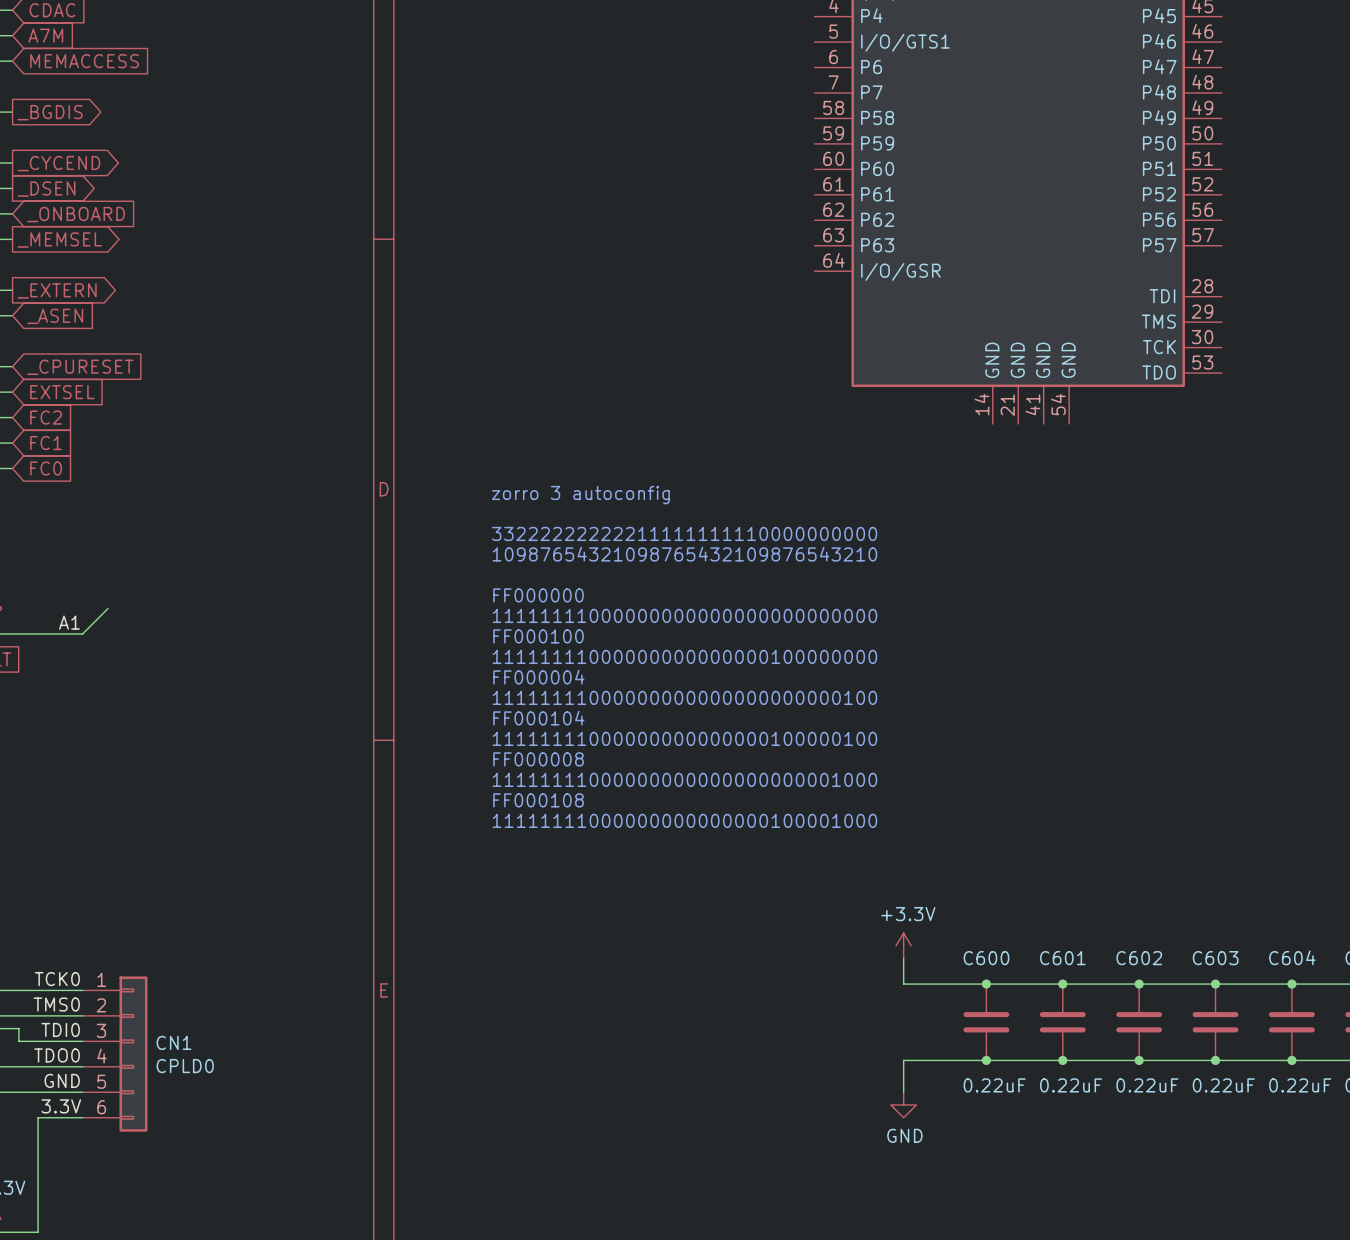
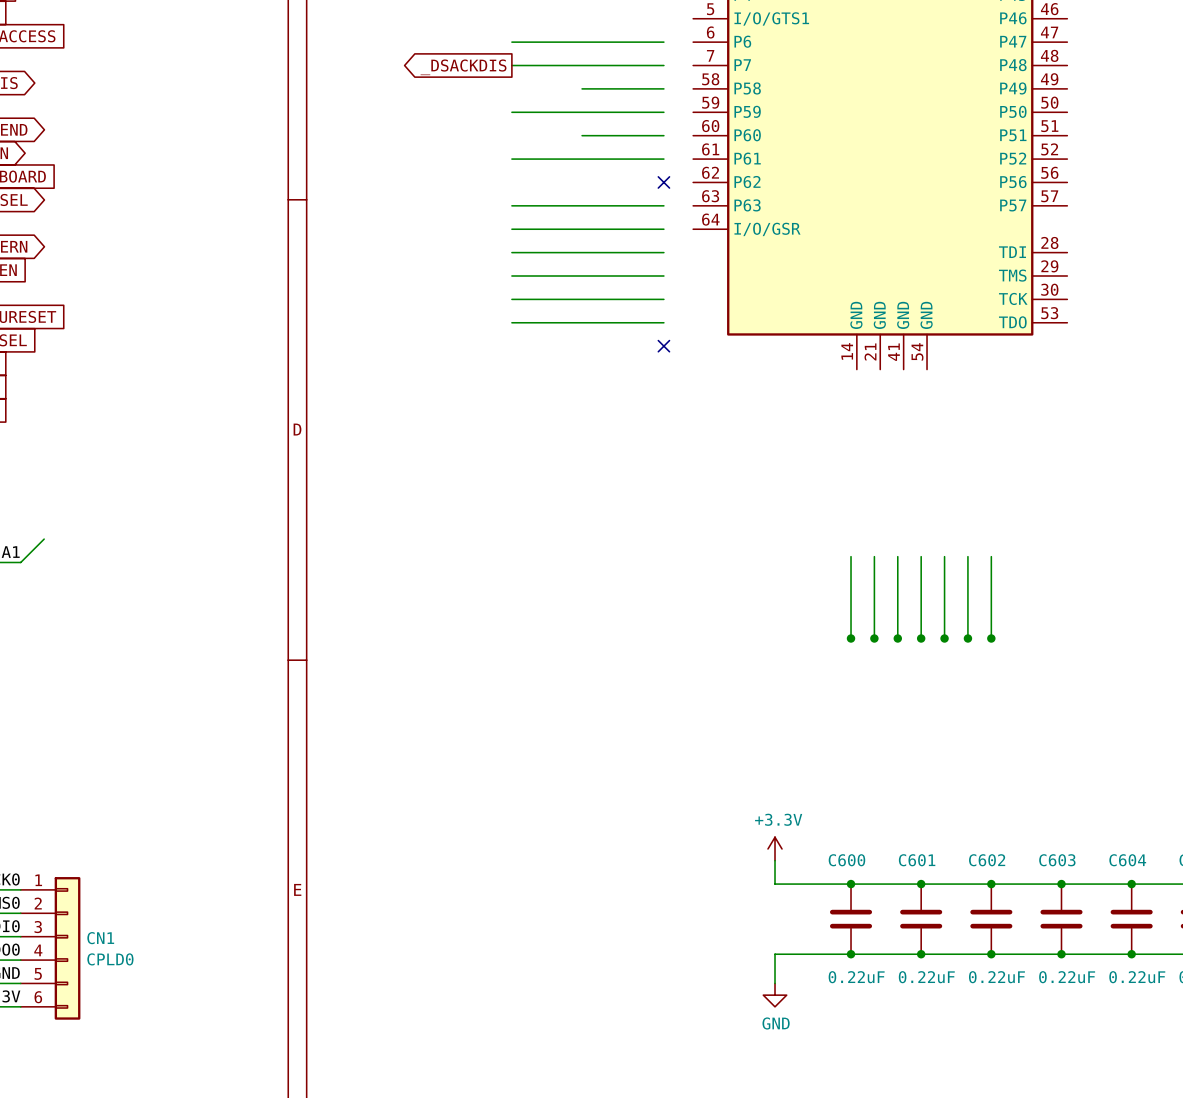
wire: none -> (511, 42) (663, 42)
wire: none -> (511, 65) (663, 65)
global label: none -> _DSACKDIS (463, 67)
wire: none -> (582, 88) (663, 88)
wire: none -> (511, 112) (663, 112)
wire: none -> (582, 135) (663, 135)
wire: none -> (511, 159) (663, 159)
no-connect mark: none -> (663, 182)
wire: none -> (511, 205) (663, 205)
wire: none -> (511, 229) (663, 229)
wire: none -> (511, 252) (663, 252)
wire: none -> (511, 276) (663, 276)
wire: none -> (511, 299) (663, 299)
wire: none -> (511, 322) (663, 322)
no-connect mark: none -> (663, 346)
text: zorro 3 autoconfig (580, 495) -> none
text: 33222222222211111111110000000000 (684, 533) -> none
text: 10987654321098765432109876543210 (684, 554) -> none
text: FF000000 (538, 595) -> none
text: 11111111000000000000000000000000 (684, 615) -> none
wire: none -> (851, 556) (851, 638)
wire: none -> (874, 556) (874, 638)
wire: none -> (897, 556) (897, 638)
wire: none -> (921, 556) (921, 638)
wire: none -> (944, 556) (944, 638)
wire: none -> (967, 556) (967, 638)
wire: none -> (991, 556) (991, 638)
text: FF000100 (538, 636) -> none
text: 11111111000000000000000100000000 (684, 656) -> none
text: FF000004 (538, 677) -> none
text: 11111111000000000000000000000100 (684, 697) -> none
junction: none -> (851, 638)
junction: none -> (874, 638)
junction: none -> (897, 638)
junction: none -> (921, 638)
junction: none -> (944, 638)
junction: none -> (967, 638)
junction: none -> (991, 638)
text: FF000104 (538, 718) -> none
text: 11111111000000000000000100000100 (684, 738) -> none
text: FF000008 (538, 759) -> none
text: 11111111000000000000000000001000 (684, 779) -> none
text: FF000108 (538, 800) -> none
text: 11111111000000000000000100001000 (684, 820) -> none

